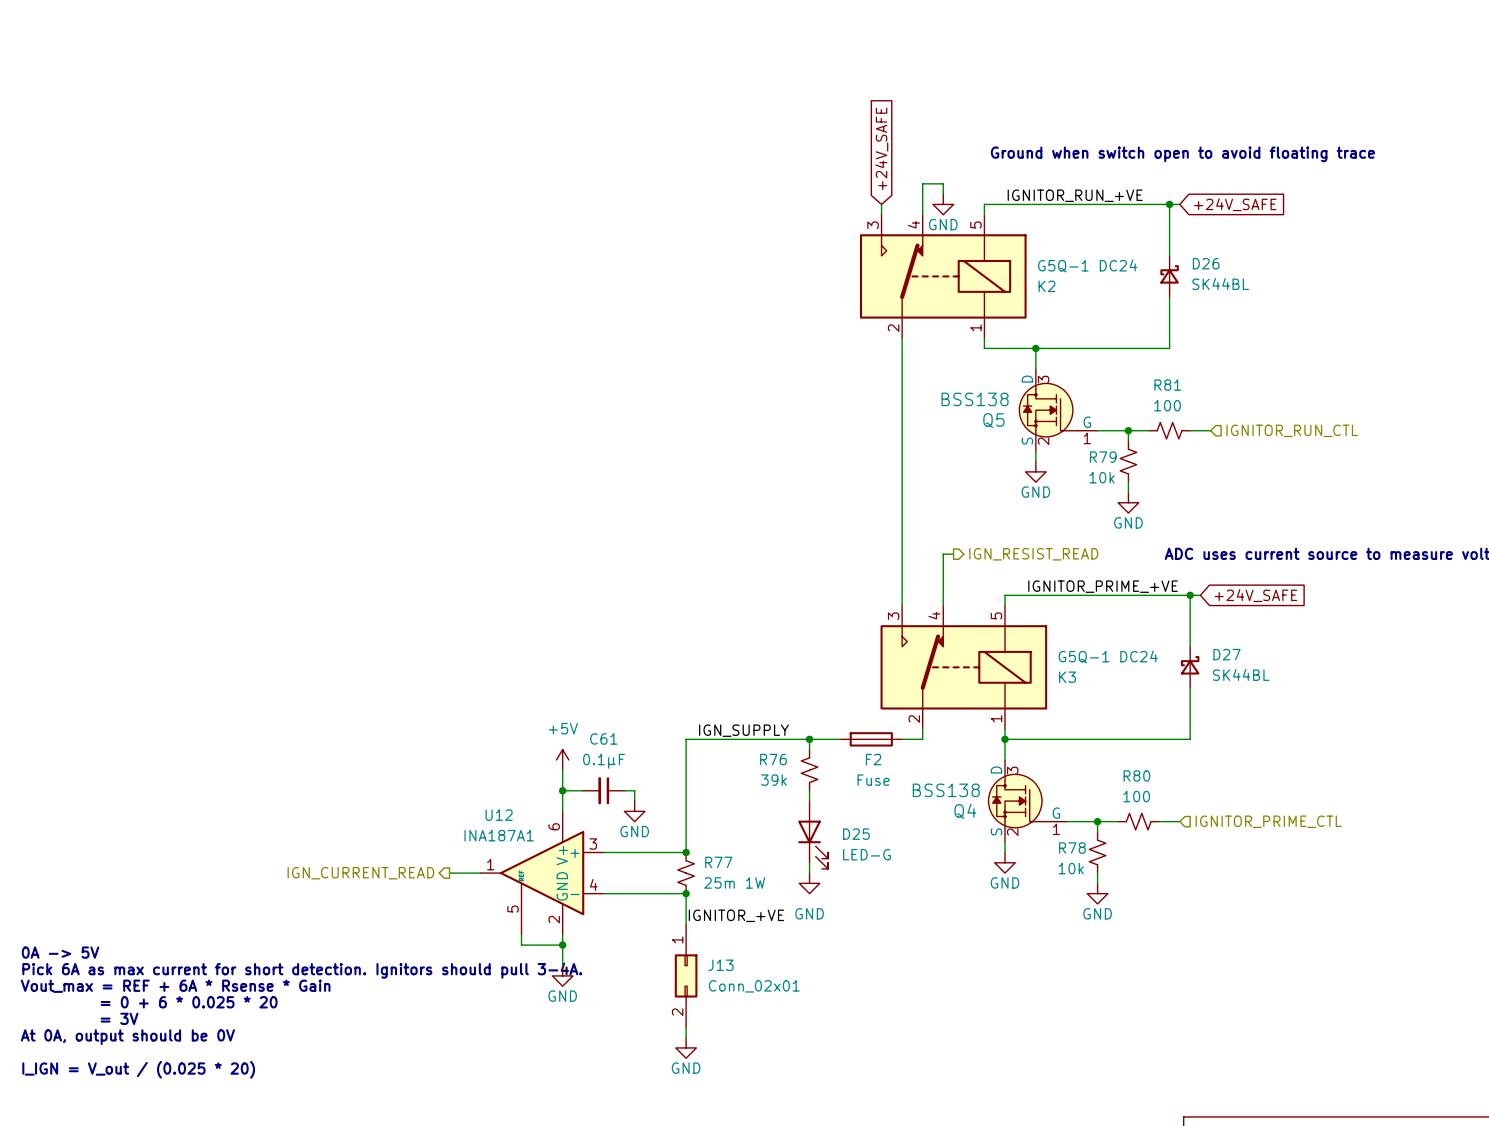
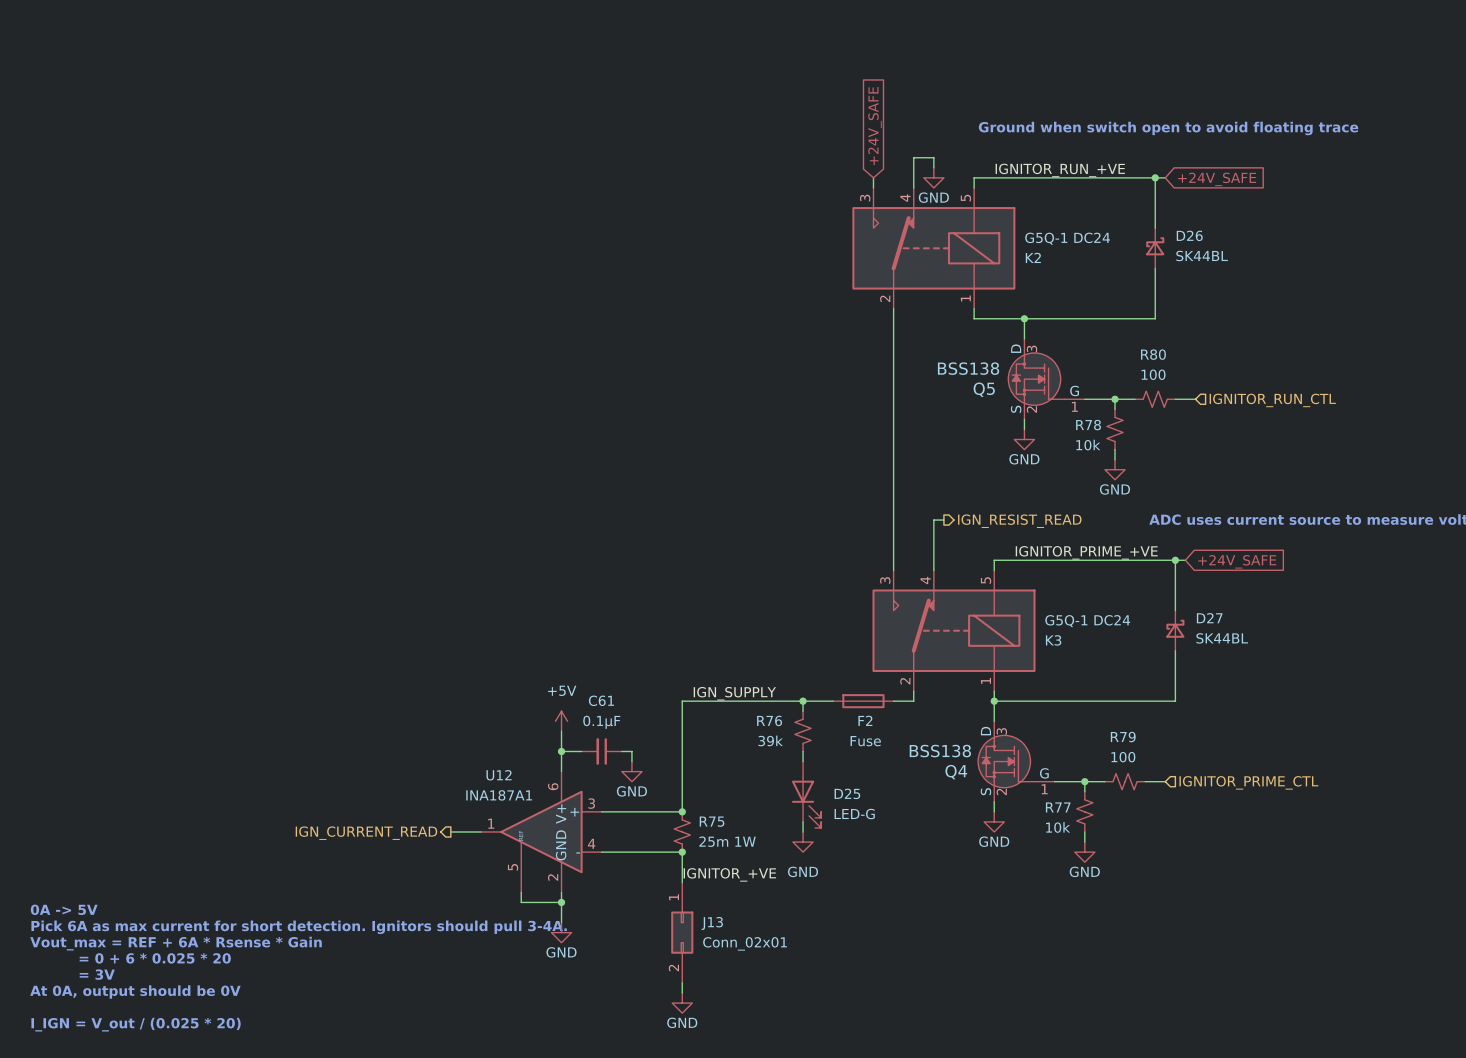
R81 name: R81 (1167, 385) -> R80 (1153, 354)
R79 name: R79 (1103, 457) -> R78 (1088, 425)
R80 name: R80 (1136, 775) -> R79 (1123, 737)
R78 name: R78 (1072, 848) -> R77 (1058, 807)
R77 name: R77 (718, 862) -> R75 (712, 821)

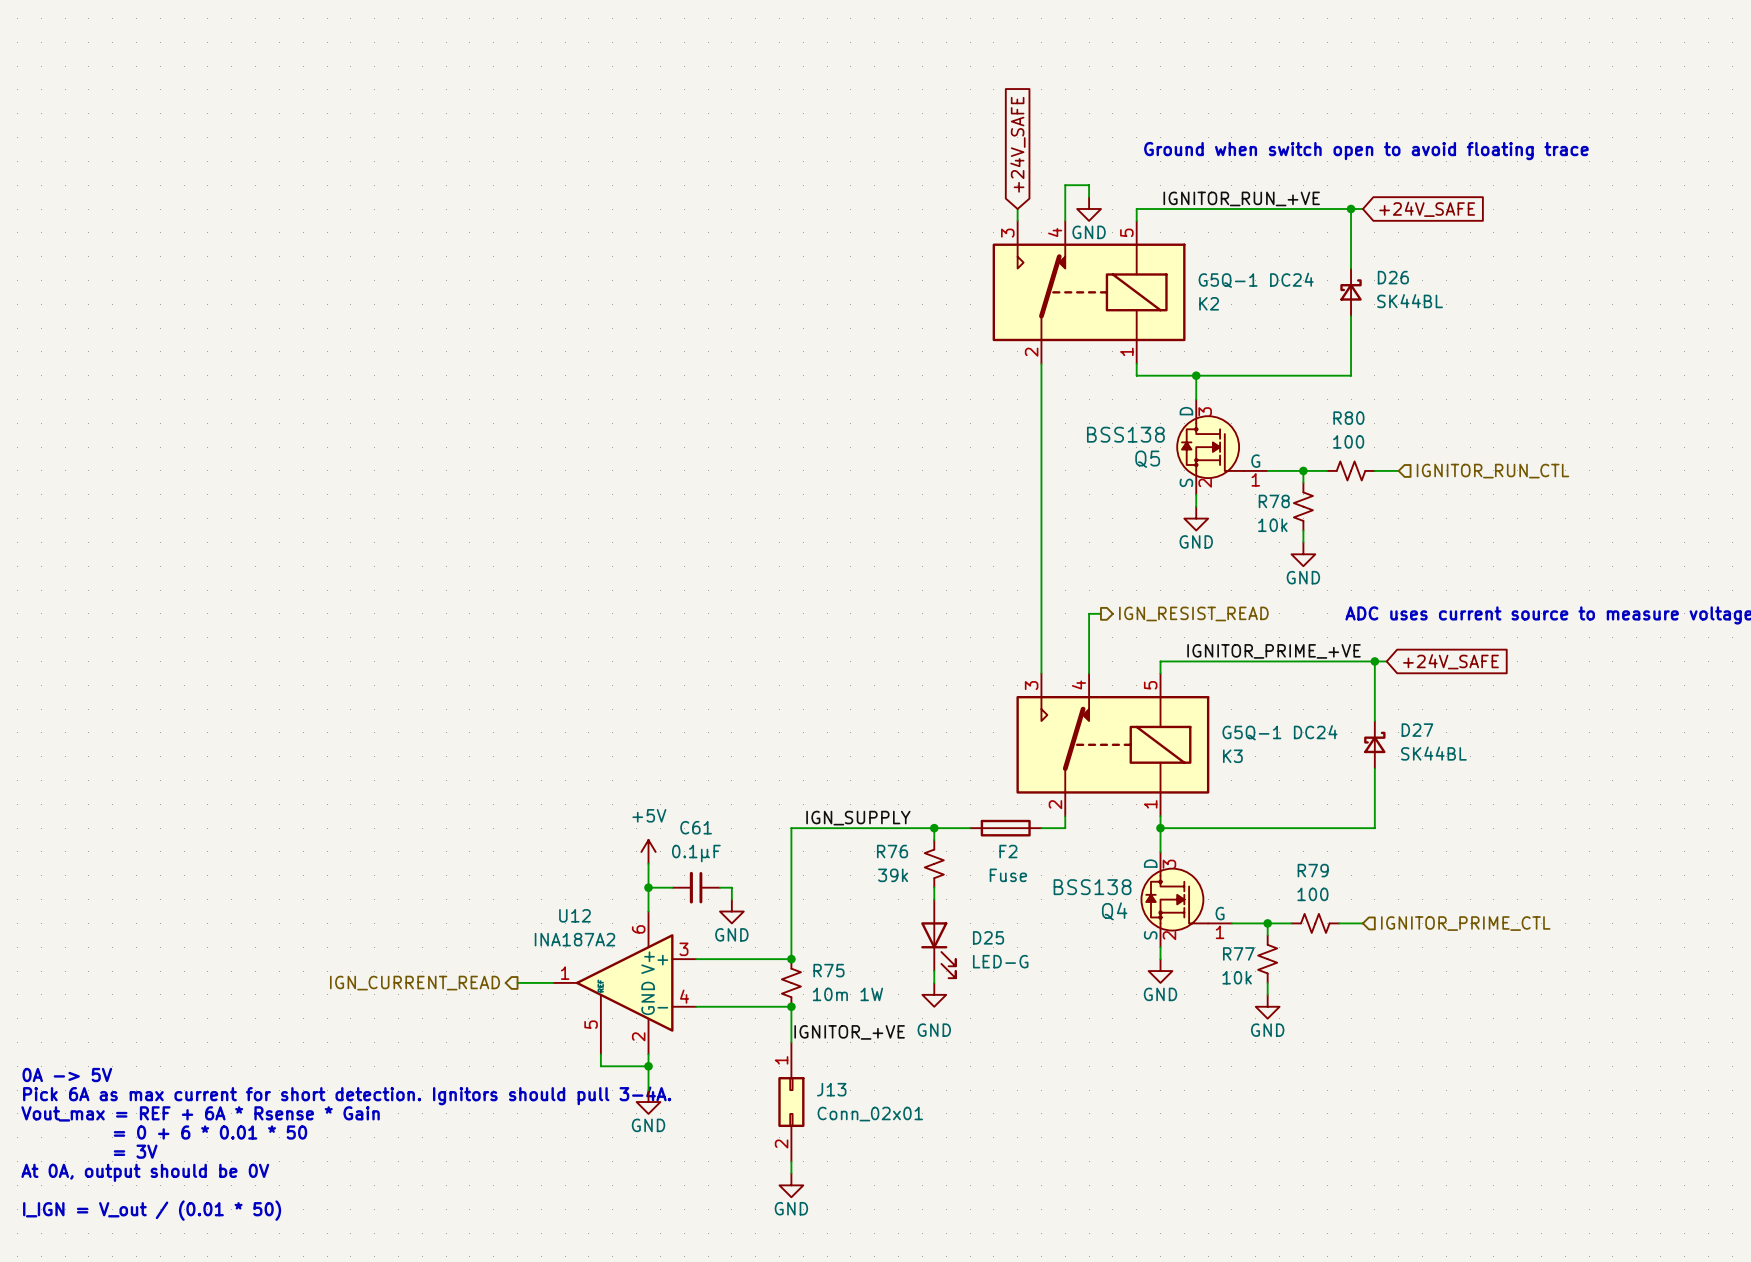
U12 value: INA187A1 (499, 795) -> INA187A2 (574, 939)
R75 value: 25m 1W (727, 841) -> 10m 1W (847, 994)
text: = 0 + 6 * 0.025 * 20 (155, 958) -> = 0 + 6 * 0.01 * 50 (210, 1132)
text: I_IGN = V_out / (0.025 * 20) (136, 1024) -> I_IGN = V_out / (0.01 * 50) (152, 1210)

